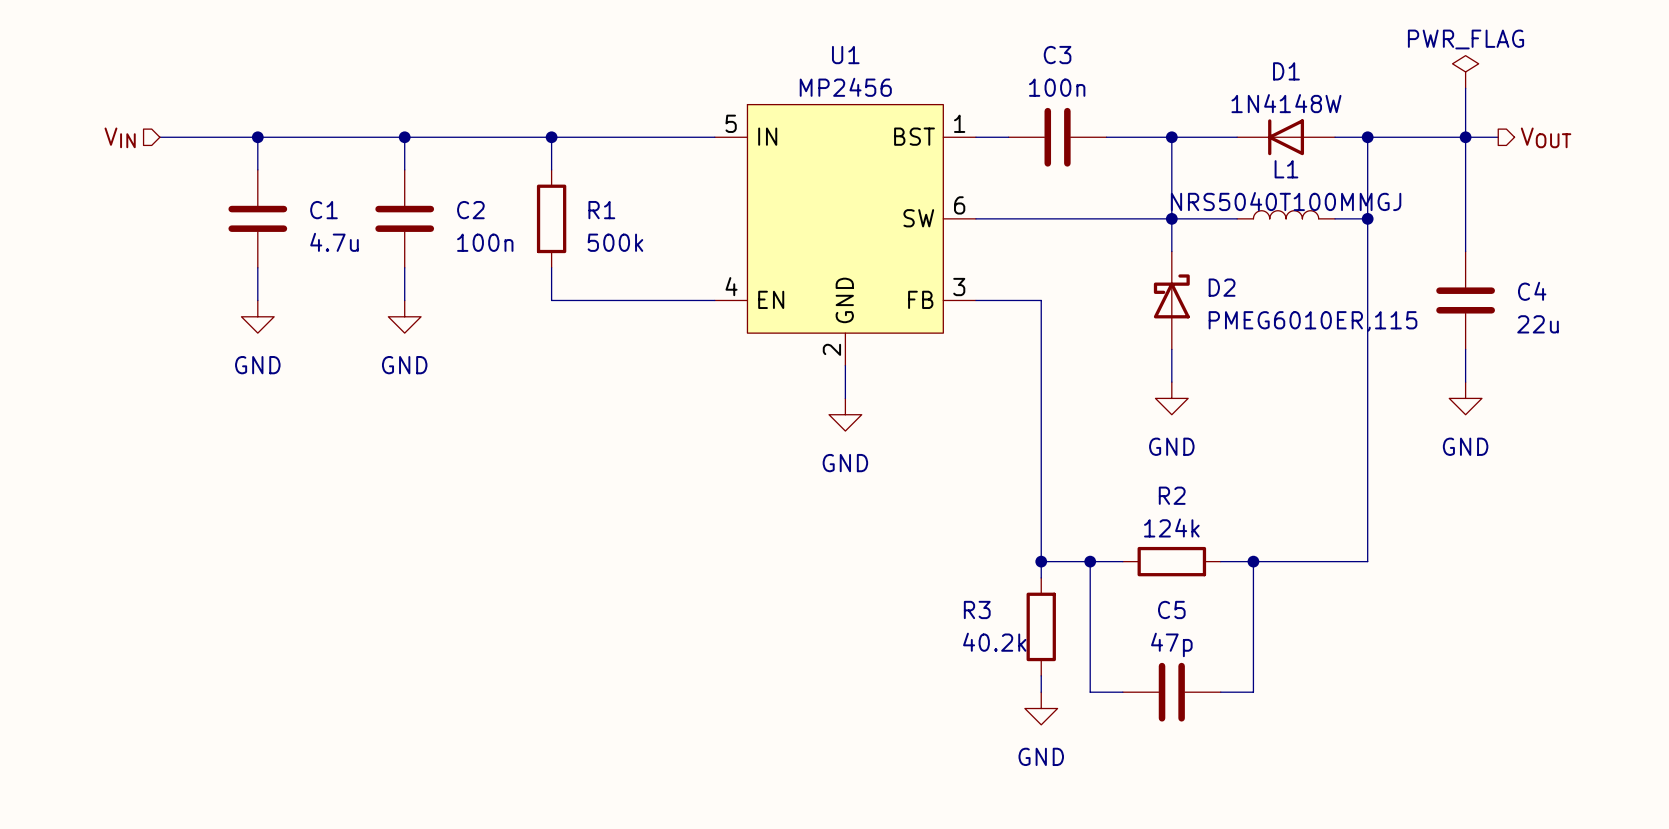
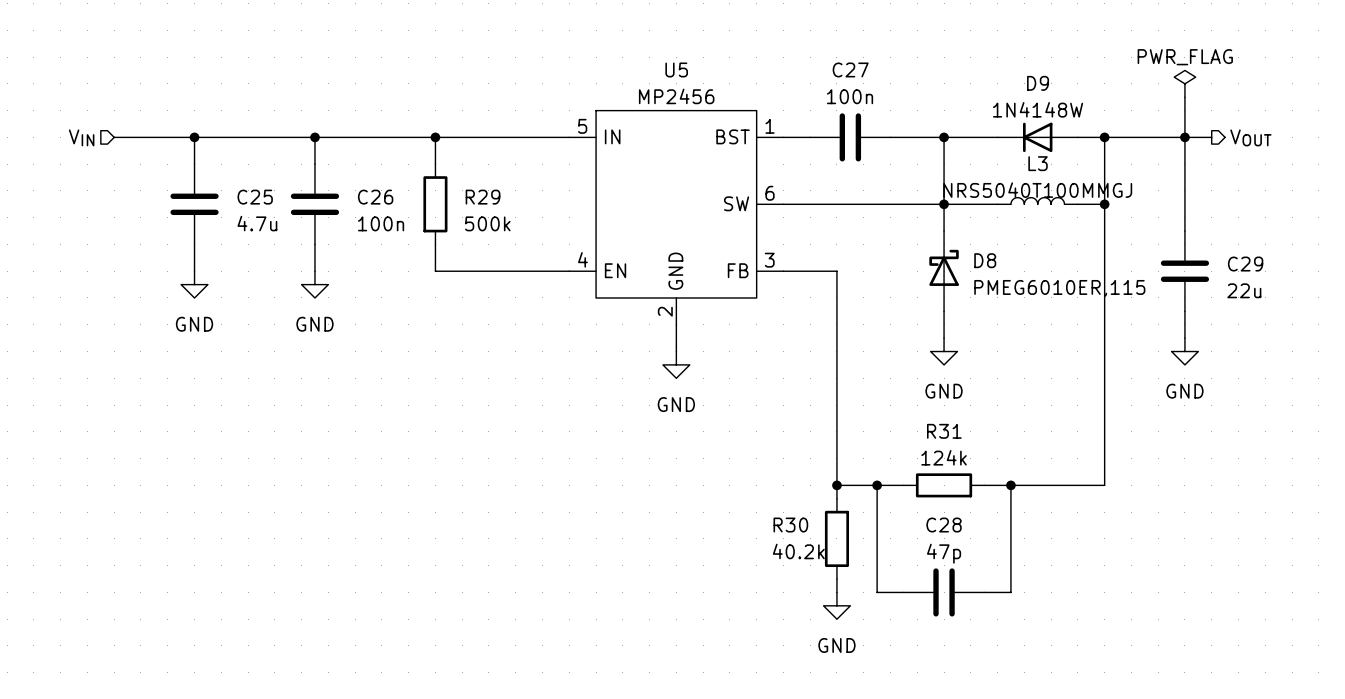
U1 name: U1 (845, 55) -> U5 (676, 69)
C3 name: C3 (1057, 55) -> C27 (850, 69)
D1 name: D1 (1286, 71) -> D9 (1038, 83)
L1 name: L1 (1286, 169) -> L3 (1038, 163)
C1 name: C1 (323, 210) -> C25 (255, 197)
C2 name: C2 (470, 210) -> C26 (375, 197)
R1 name: R1 (601, 210) -> R29 (483, 197)
D2 name: D2 (1222, 287) -> D8 (985, 260)
C4 name: C4 (1532, 291) -> C29 (1245, 264)
R2 name: R2 (1172, 495) -> R31 (944, 431)
R3 name: R3 (977, 609) -> R30 (790, 525)
C5 name: C5 (1171, 609) -> C28 (944, 525)

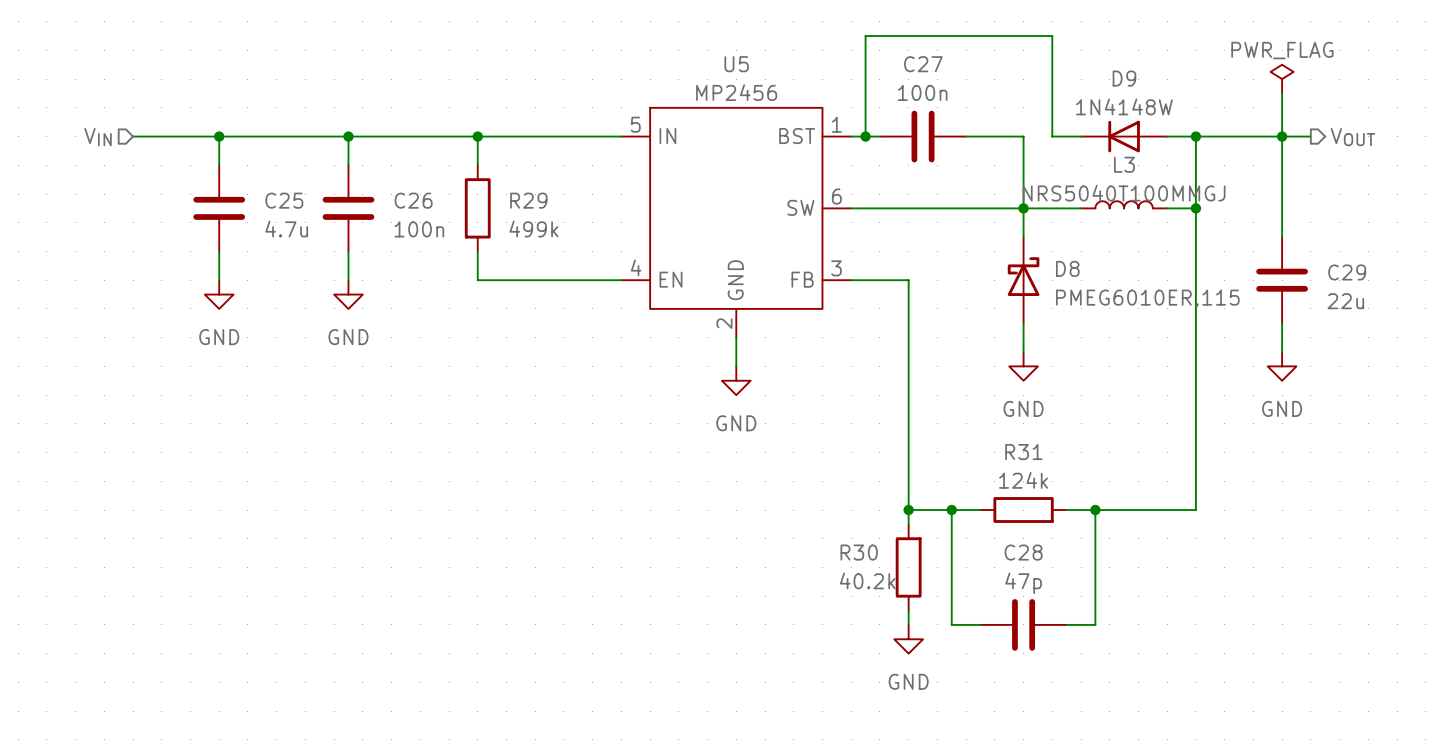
junction: none -> (865, 136)
wire: (944, 137) (970, 137) -> (865, 136) (865, 36) (1052, 36) (1052, 136)
junction: (944, 137) -> none
R29 value: 500k (487, 223) -> 499k (533, 229)

